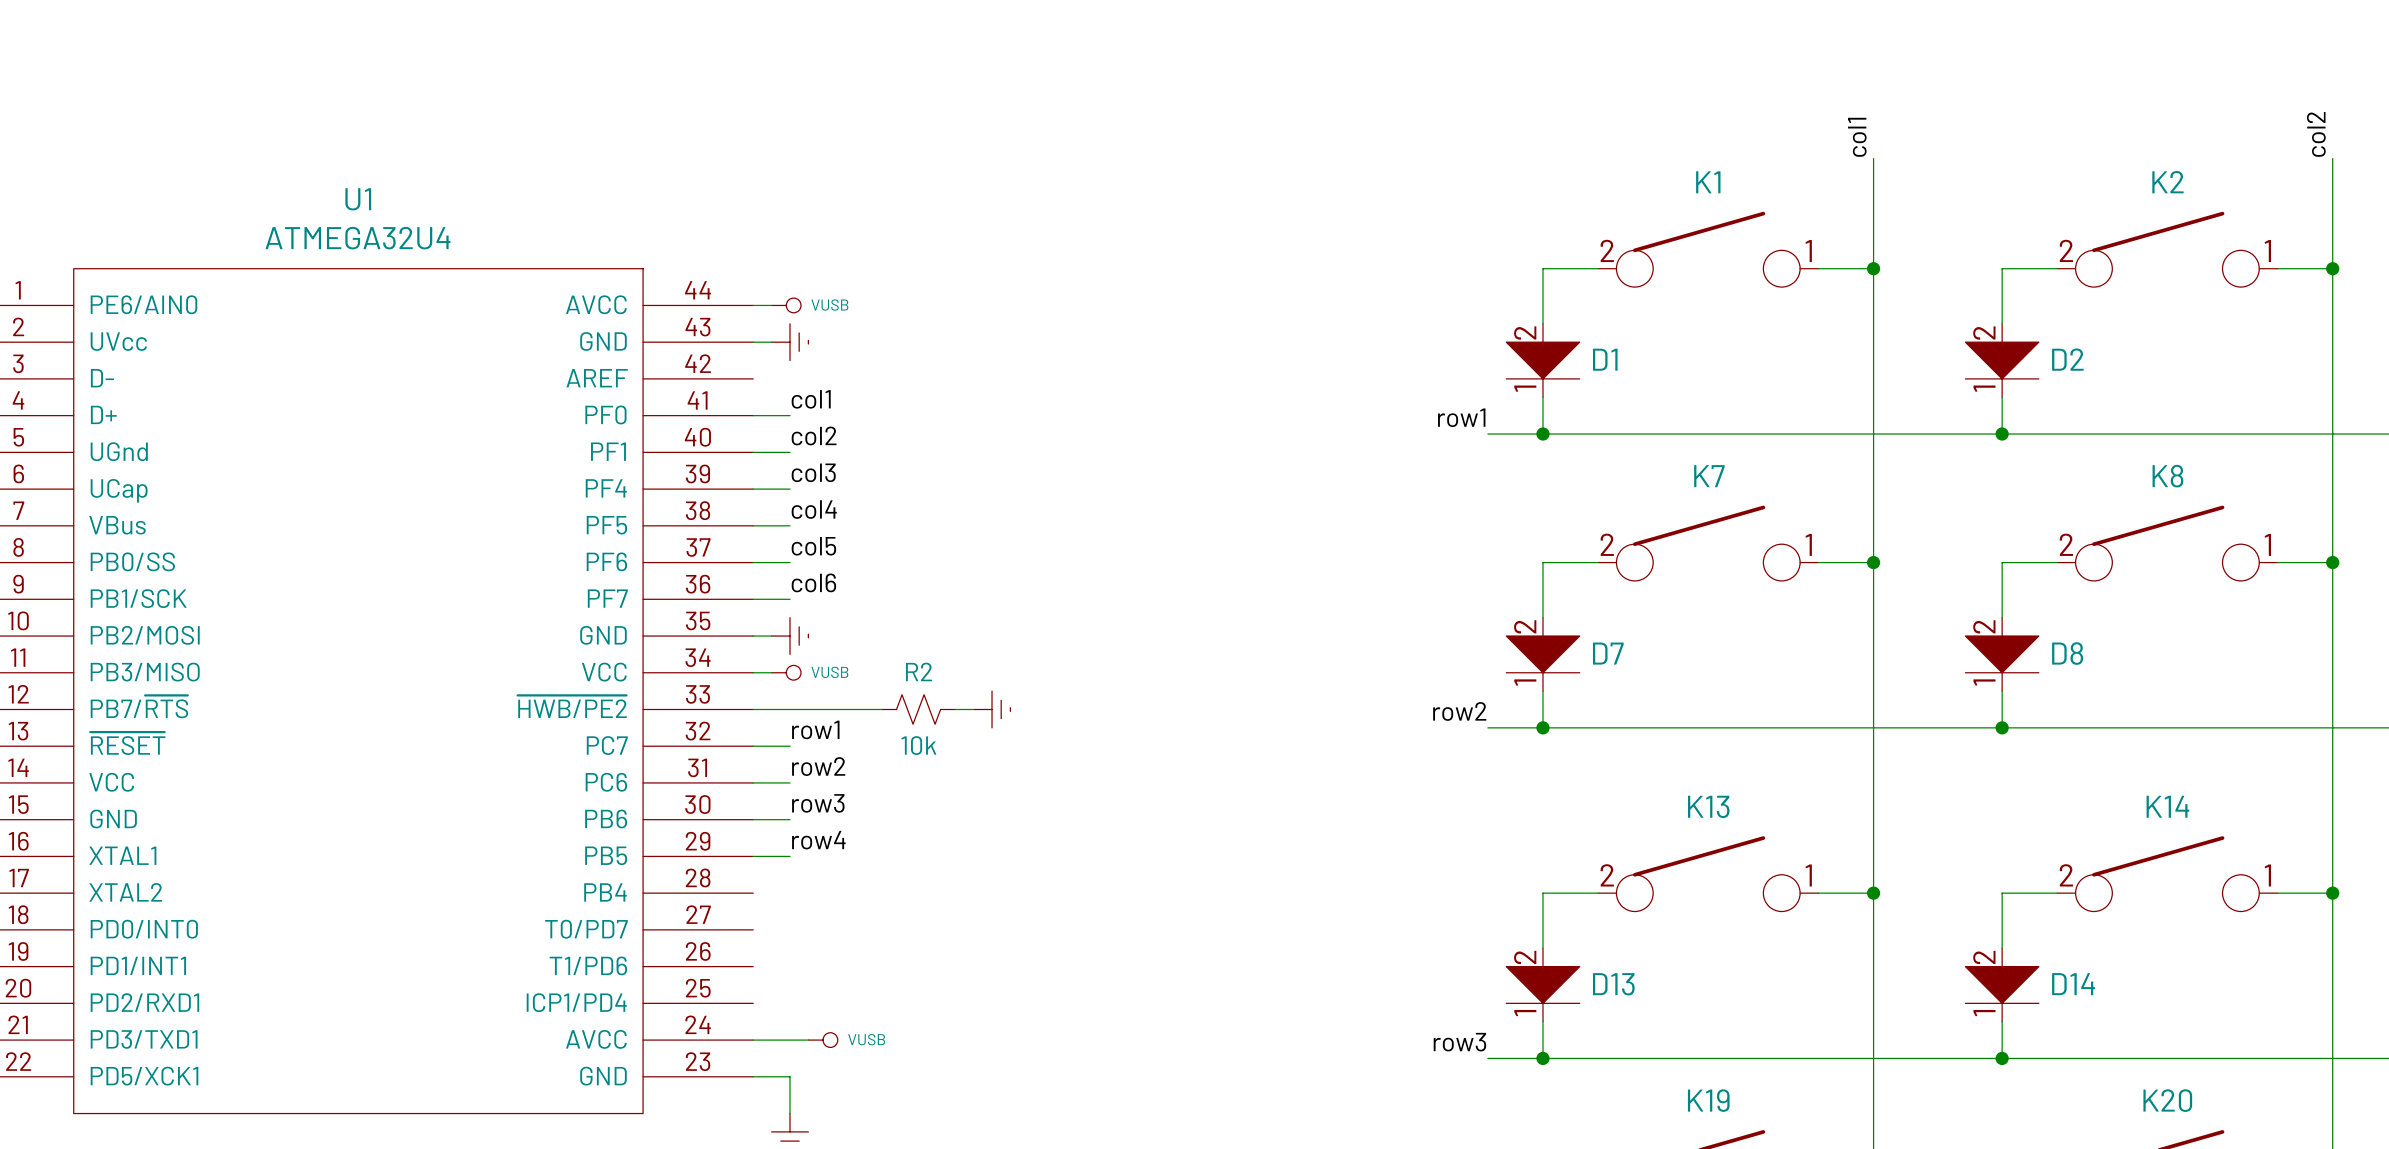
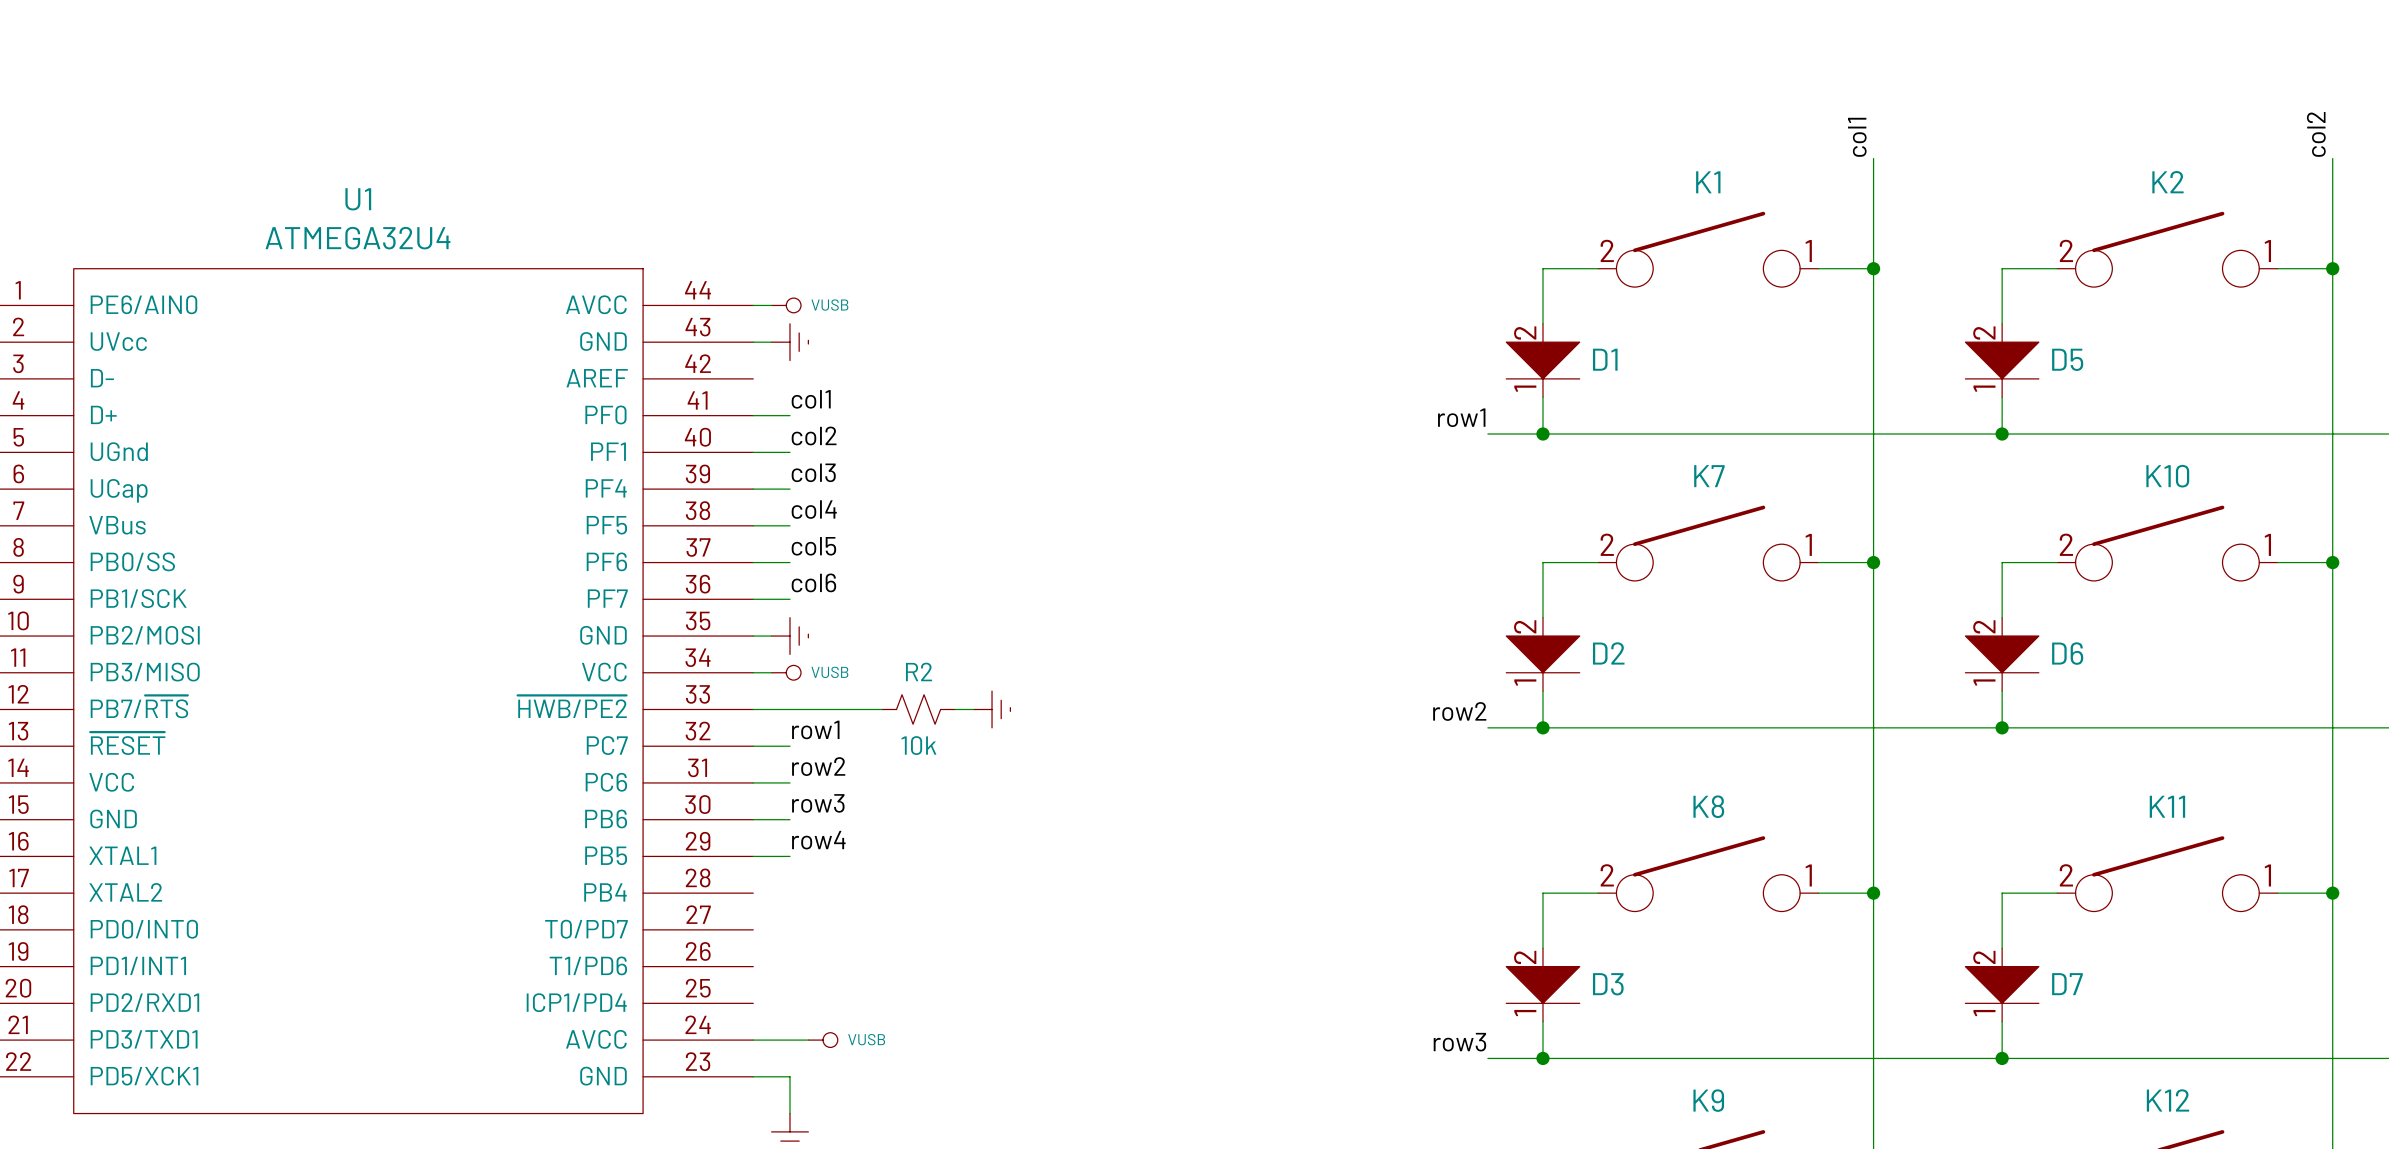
D2 name: D2 (2067, 359) -> D5 (2067, 359)
K8 name: K8 (2167, 476) -> K10 (2167, 476)
D7 name: D7 (1608, 653) -> D2 (1608, 653)
D8 name: D8 (2067, 653) -> D6 (2067, 653)
K13 name: K13 (1708, 806) -> K8 (1708, 806)
K14 name: K14 (2167, 806) -> K11 (2167, 806)
D13 name: D13 (1613, 984) -> D3 (1608, 984)
D14 name: D14 (2073, 984) -> D7 (2067, 984)
K19 name: K19 (1708, 1100) -> K9 (1708, 1100)
K20 name: K20 (2167, 1100) -> K12 (2167, 1100)

